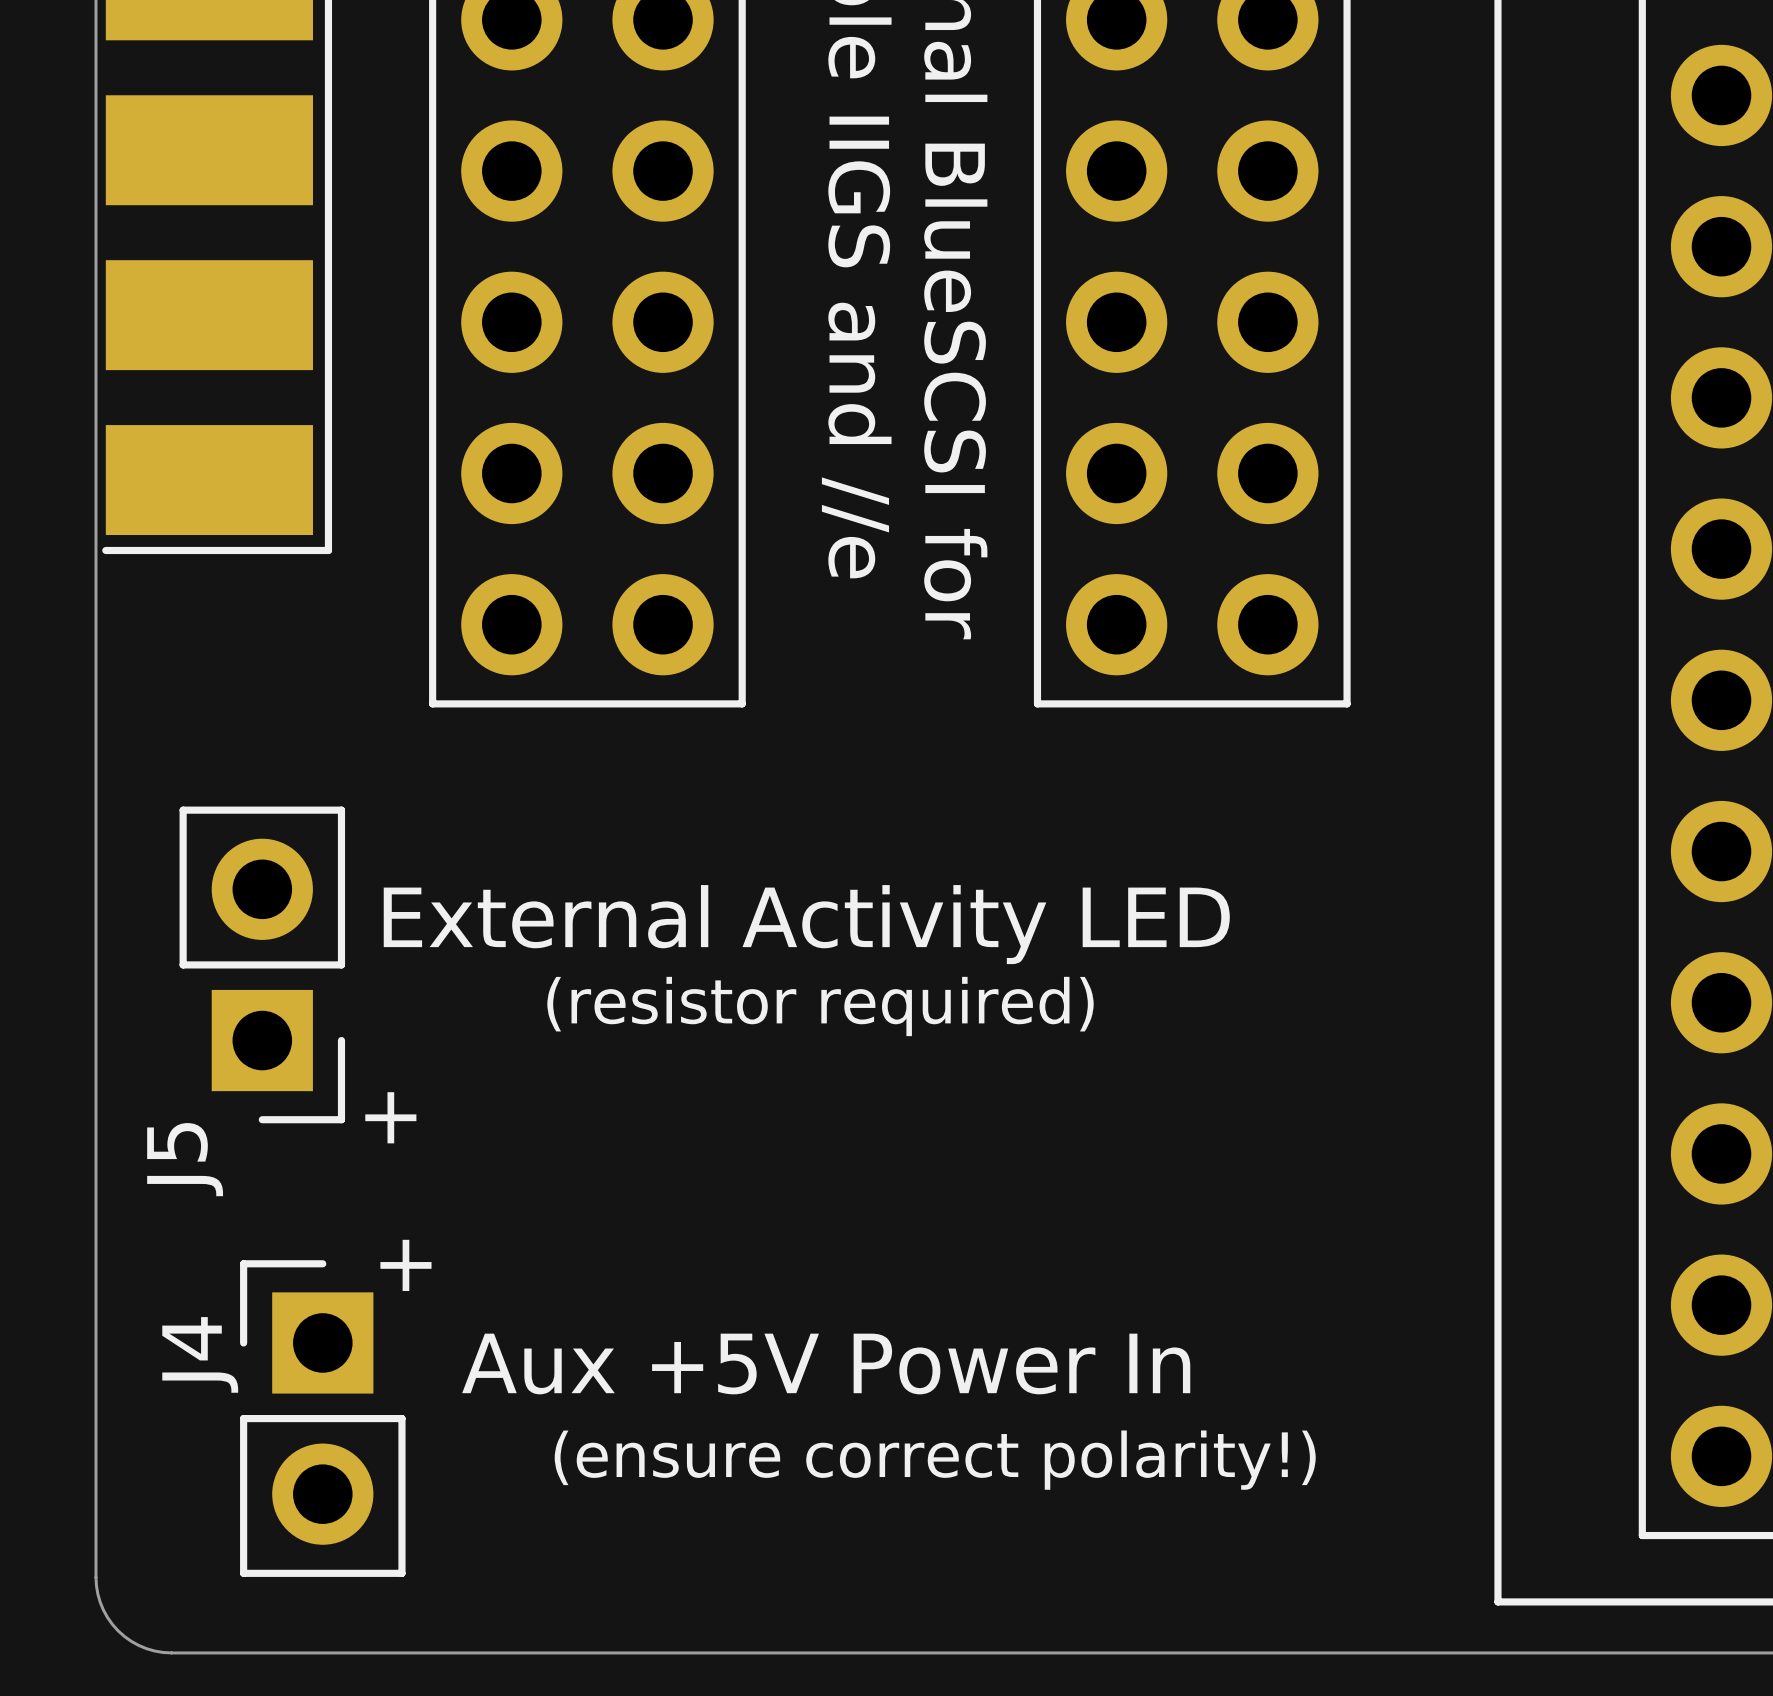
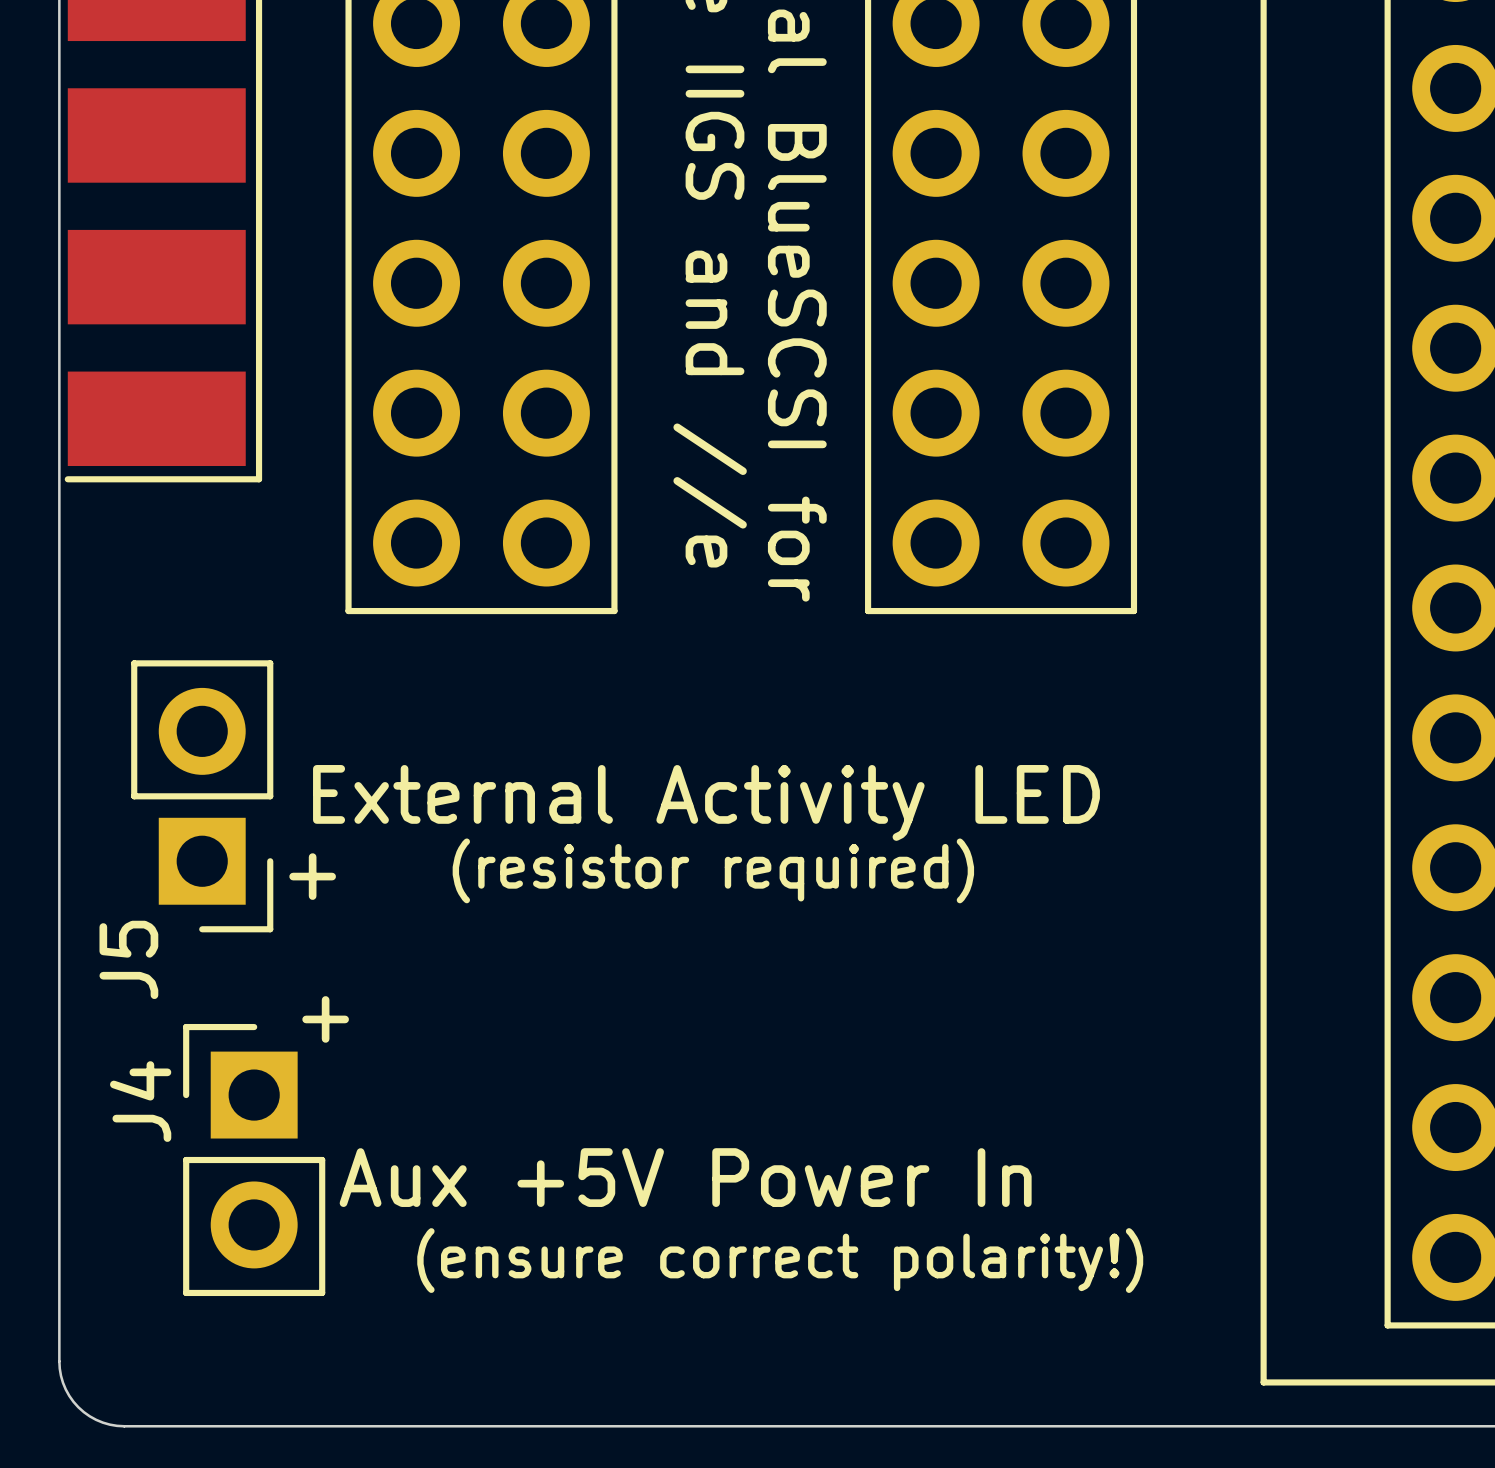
J5 position: (262, 964) -> (202, 796)
text: none -> + (312, 876)
text: + (390, 1117) -> none
text: none -> + (325, 1019)
text: + (405, 1265) -> none
J4 position: (322, 1418) -> (254, 1160)

